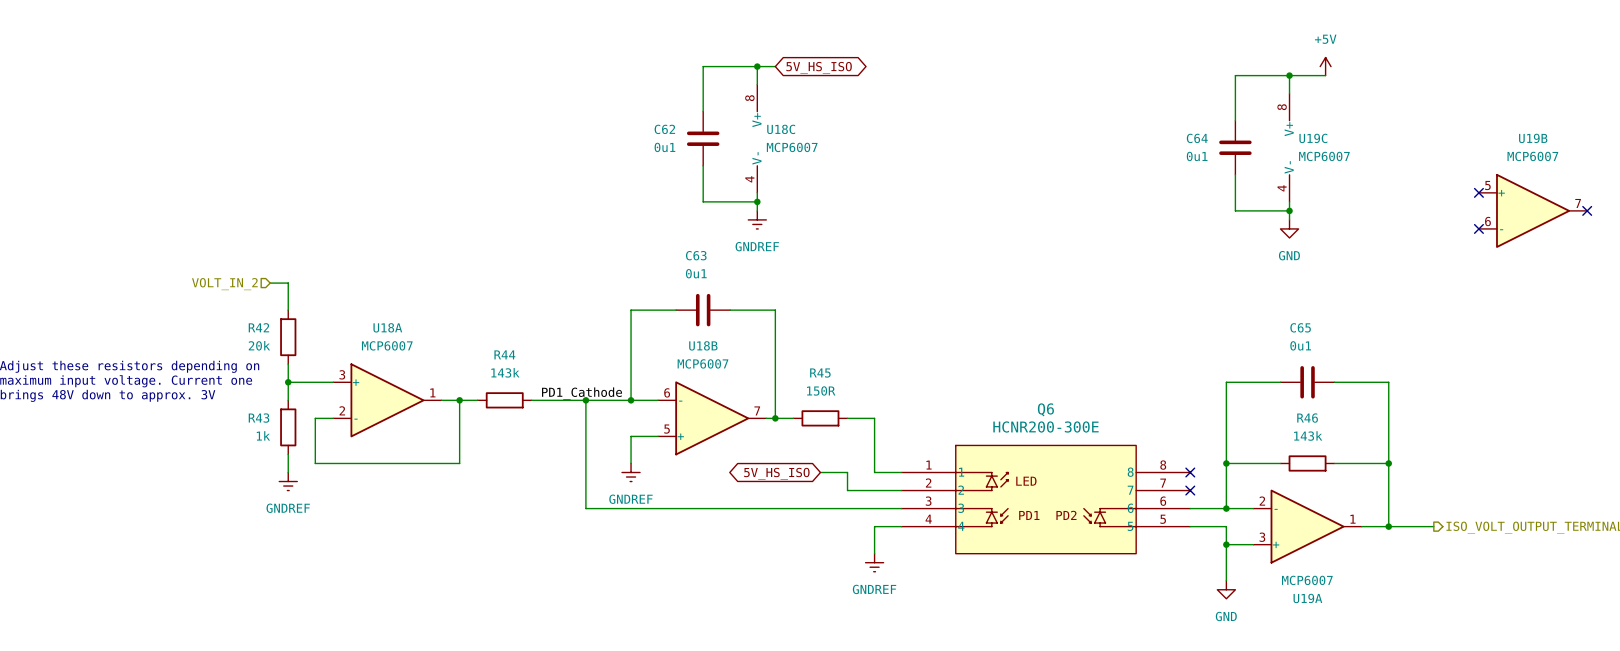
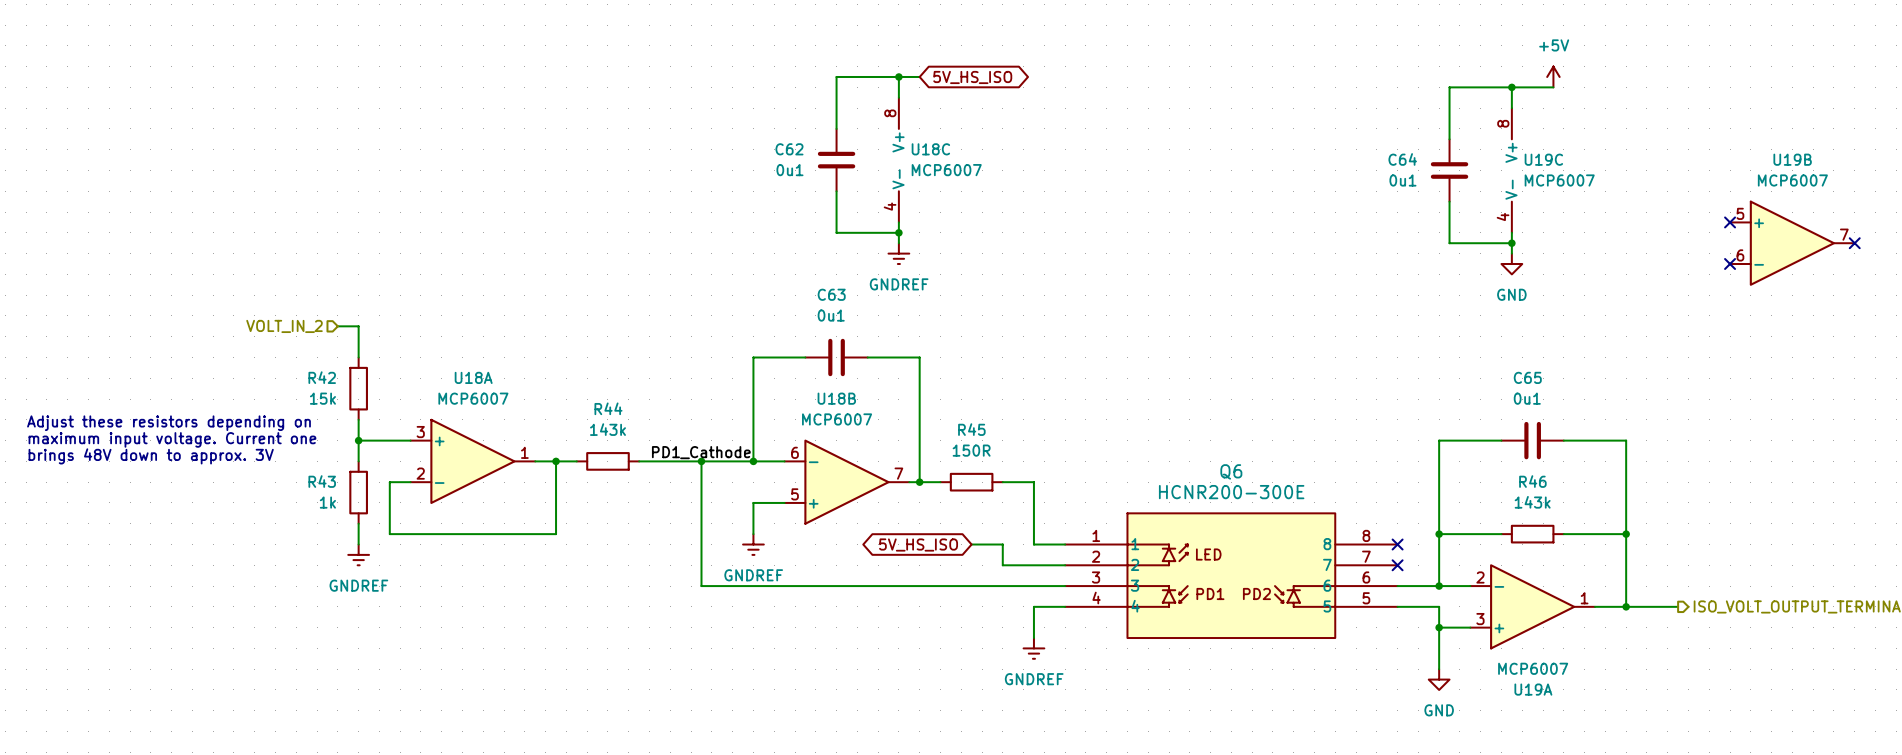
R42 value: 20k (259, 345) -> 15k (322, 398)

